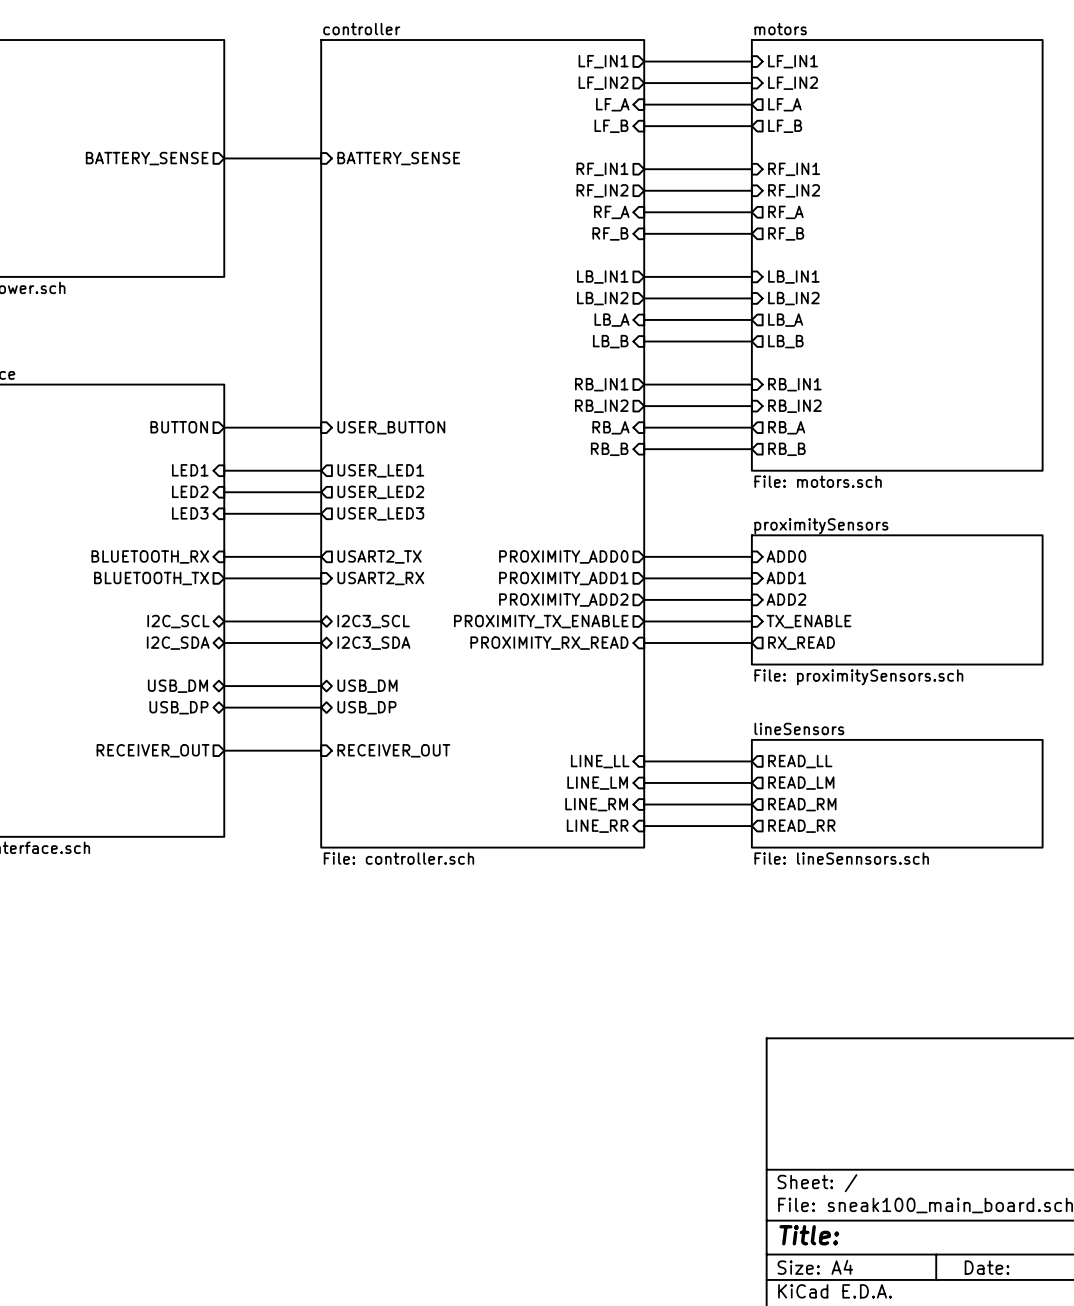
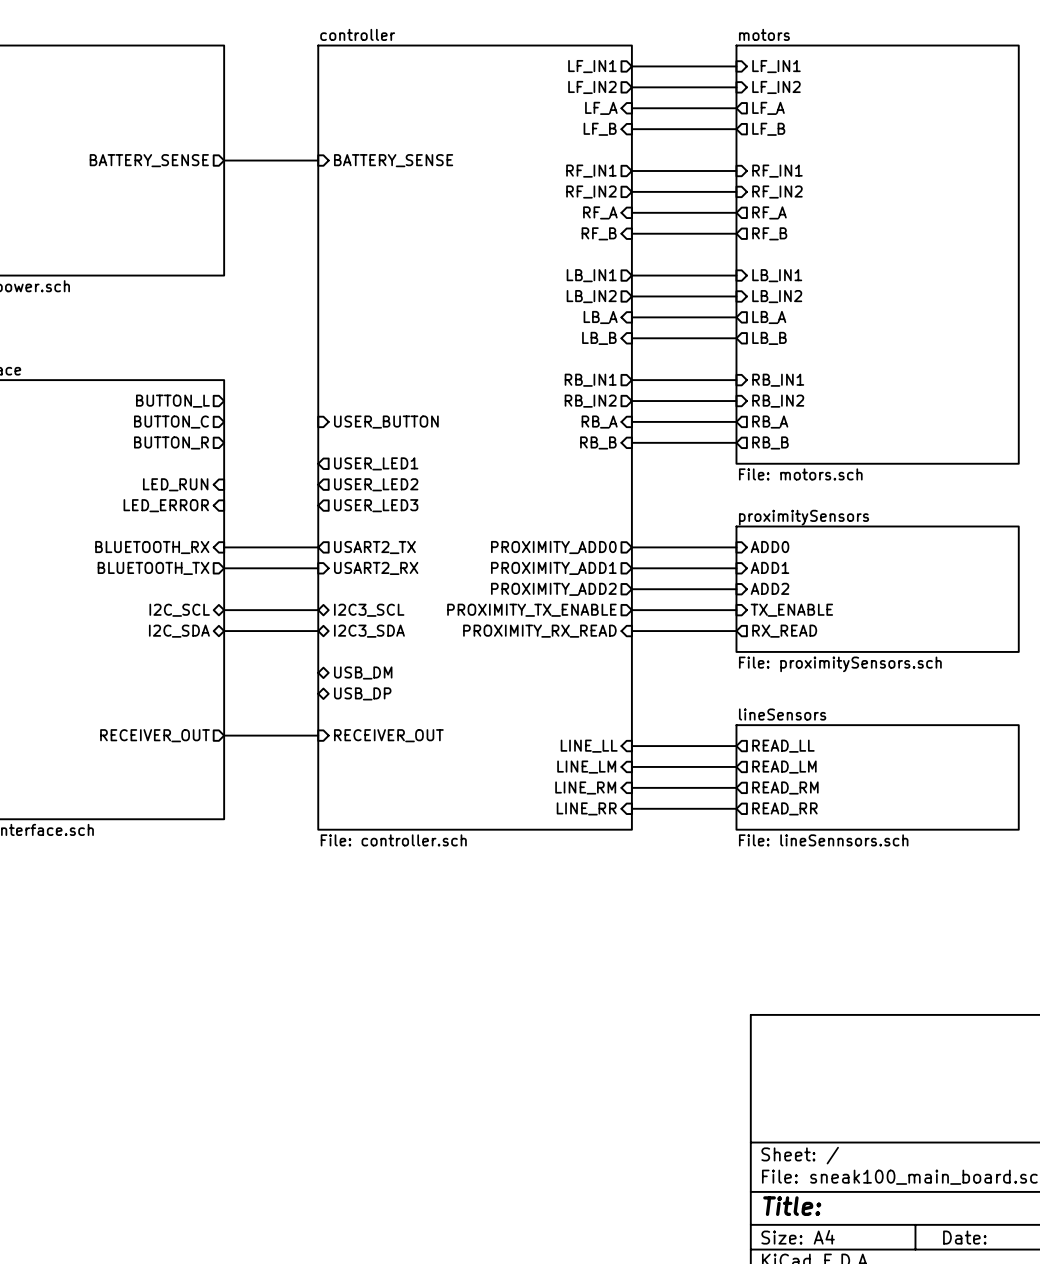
sheet pin: none -> BUTTON_L (172, 401)
sheet pin: BUTTON (179, 427) -> BUTTON_C (171, 422)
wire: (224, 427) (321, 427) -> none
sheet pin: none -> BUTTON_R (171, 442)
sheet pin: LED1 (190, 470) -> none
wire: (224, 470) (321, 470) -> none
sheet pin: LED2 (190, 491) -> LED_RUN (175, 484)
wire: (224, 492) (321, 492) -> none
sheet pin: LED3 (190, 513) -> LED_ERROR (166, 505)
wire: (224, 513) (321, 513) -> none
sheet pin: USB_DM (177, 686) -> none
wire: (224, 686) (321, 686) -> none
sheet pin: USB_DP (178, 707) -> none
wire: (224, 707) (321, 707) -> none

